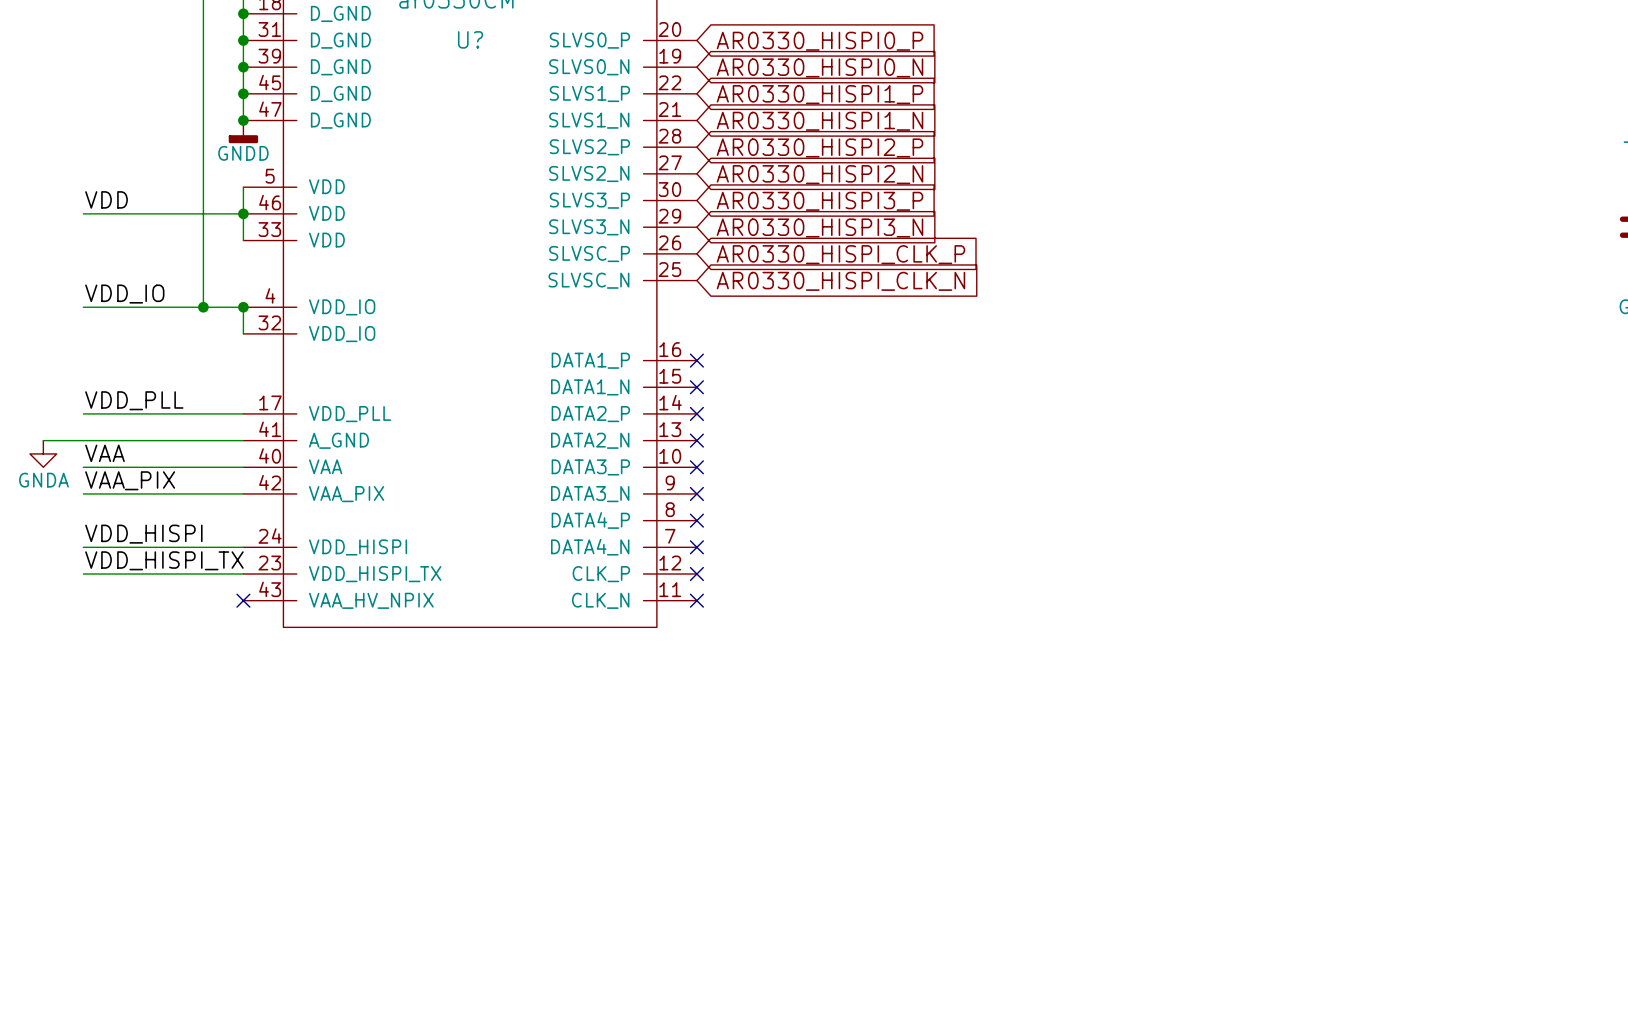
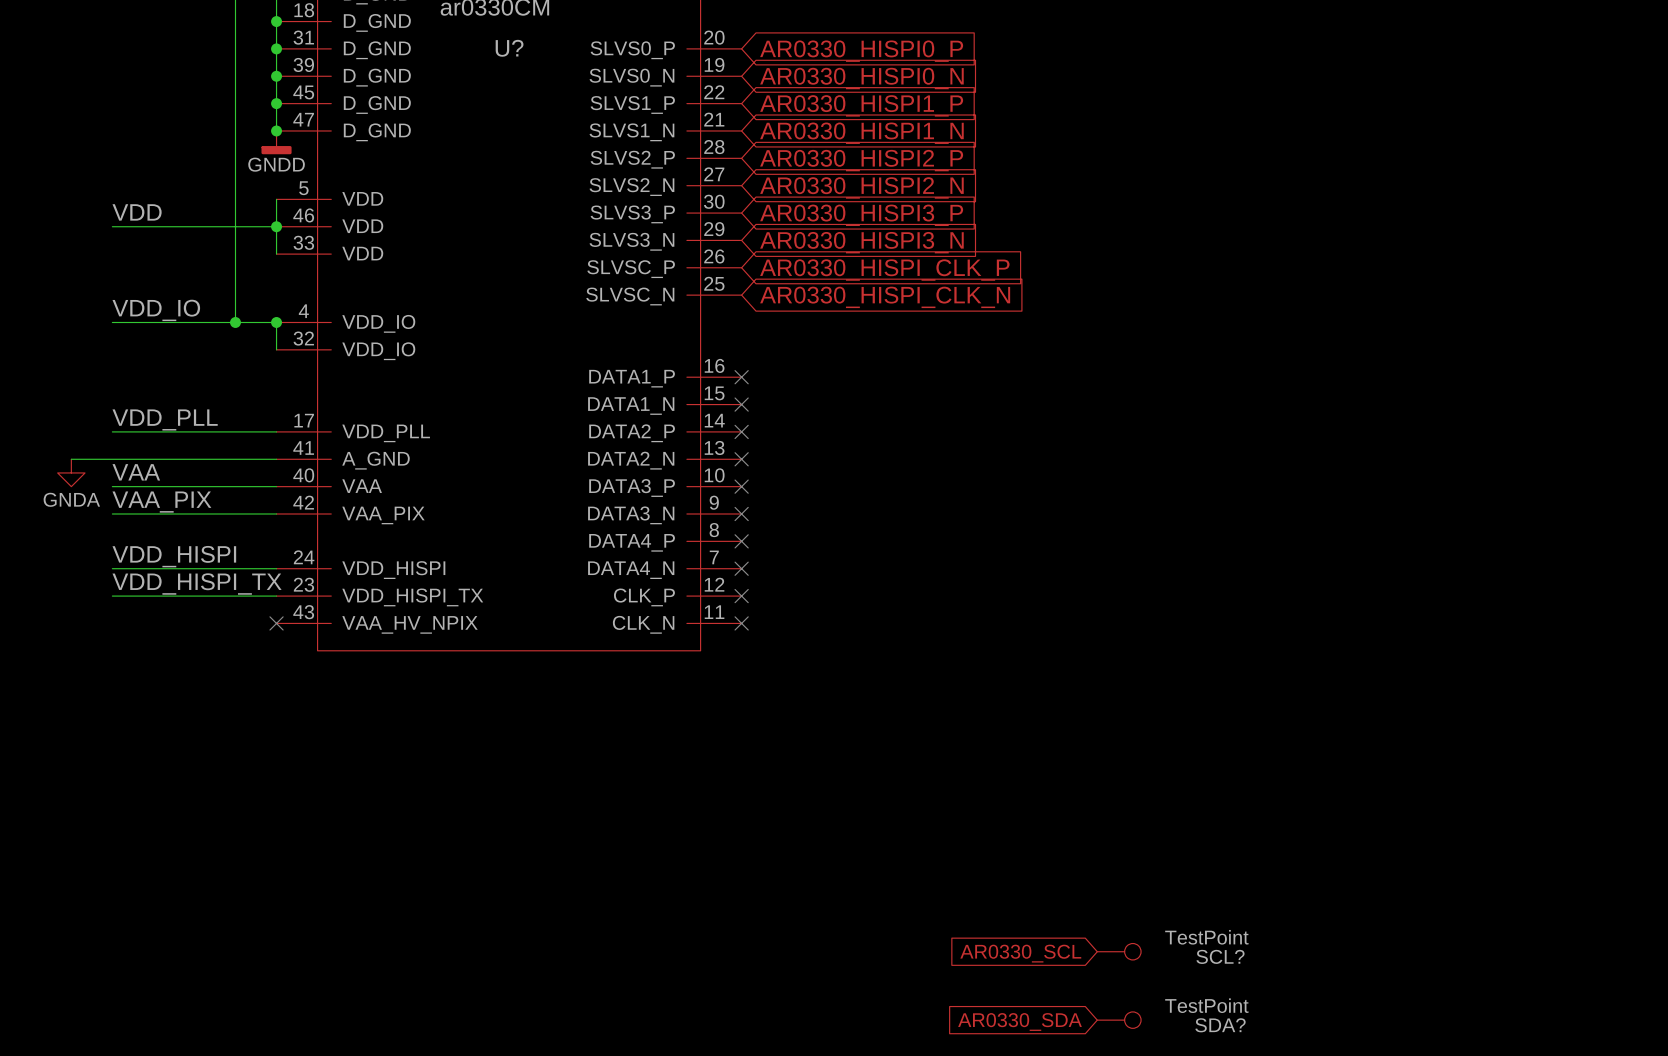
SCL?: none -> TestPoint (1119, 951)
global label: none -> AR0330_SCL (1020, 953)
SDA?: none -> TestPoint (1119, 1020)
global label: none -> AR0330_SDA (1020, 1022)

